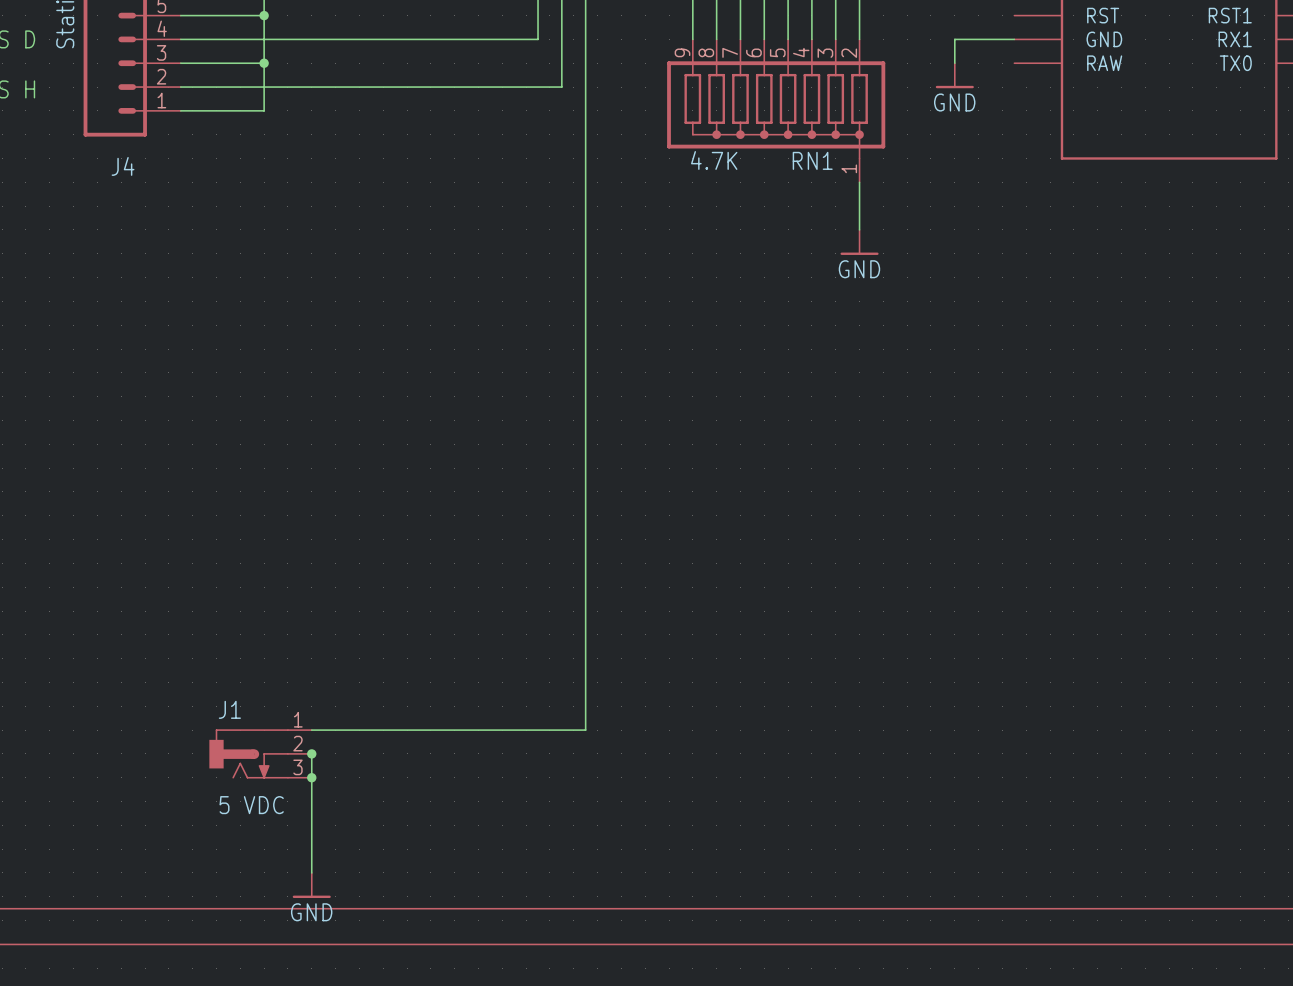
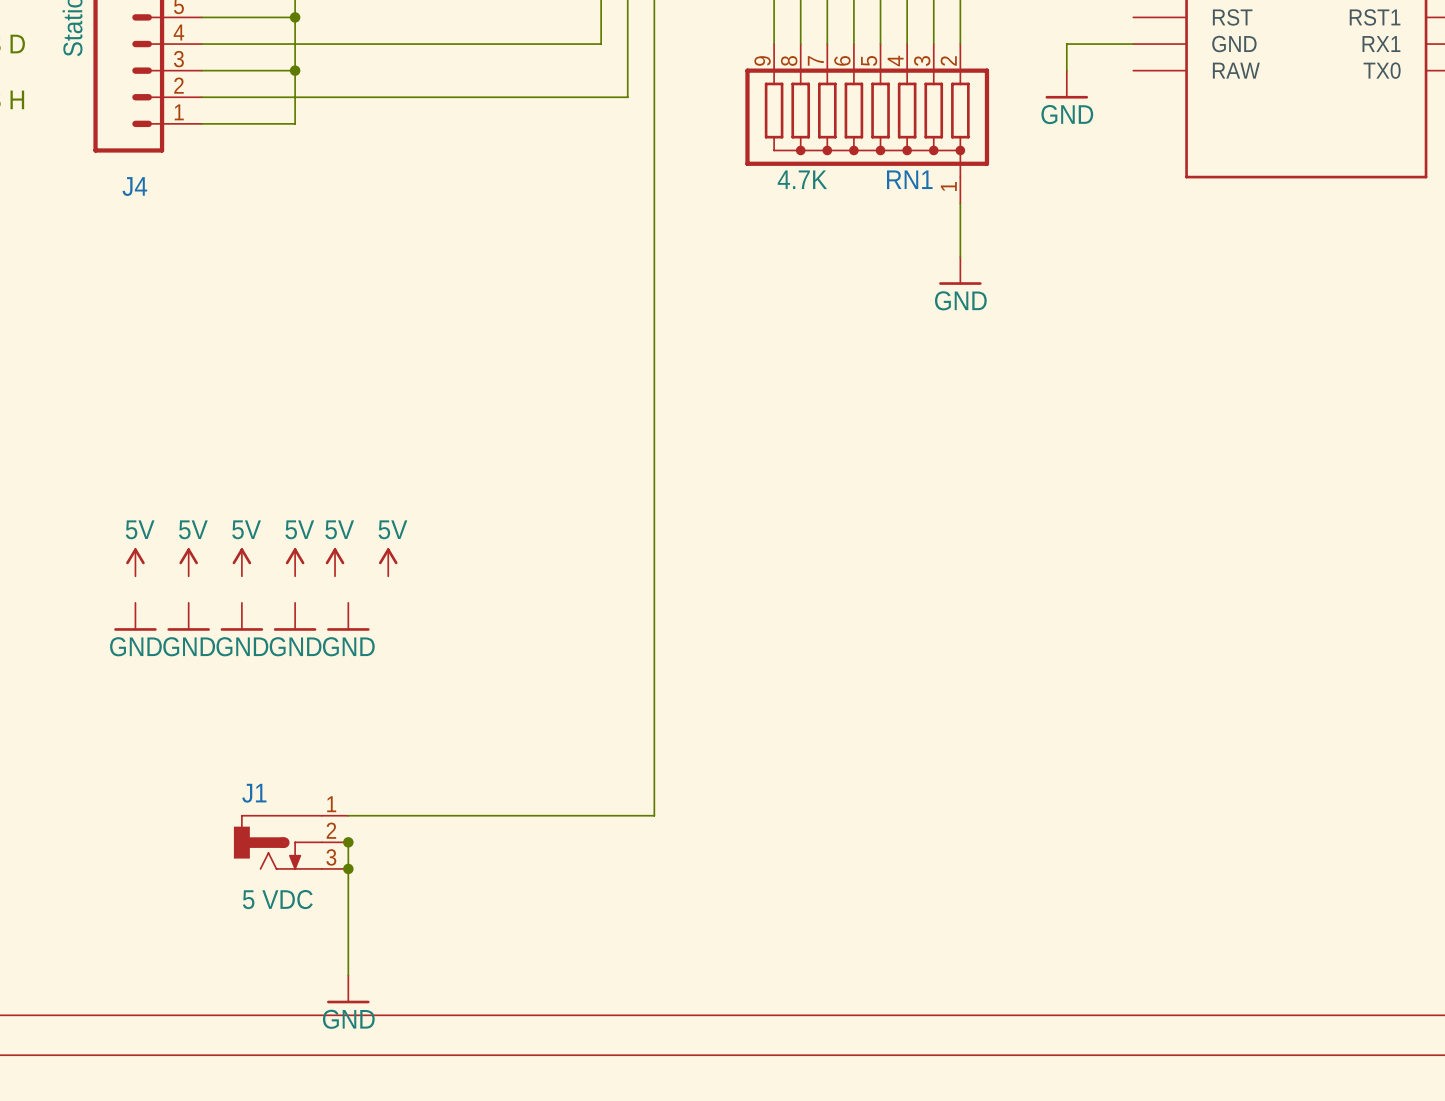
power symbol: none -> 5V (135, 562)
power symbol: none -> 5V (188, 562)
power symbol: none -> 5V (241, 562)
power symbol: none -> 5V (295, 562)
power symbol: none -> 5V (335, 562)
power symbol: none -> 5V (388, 562)
power symbol: none -> GND (135, 616)
power symbol: none -> GND (188, 616)
power symbol: none -> GND (241, 616)
power symbol: none -> GND (295, 616)
power symbol: none -> GND (348, 616)

